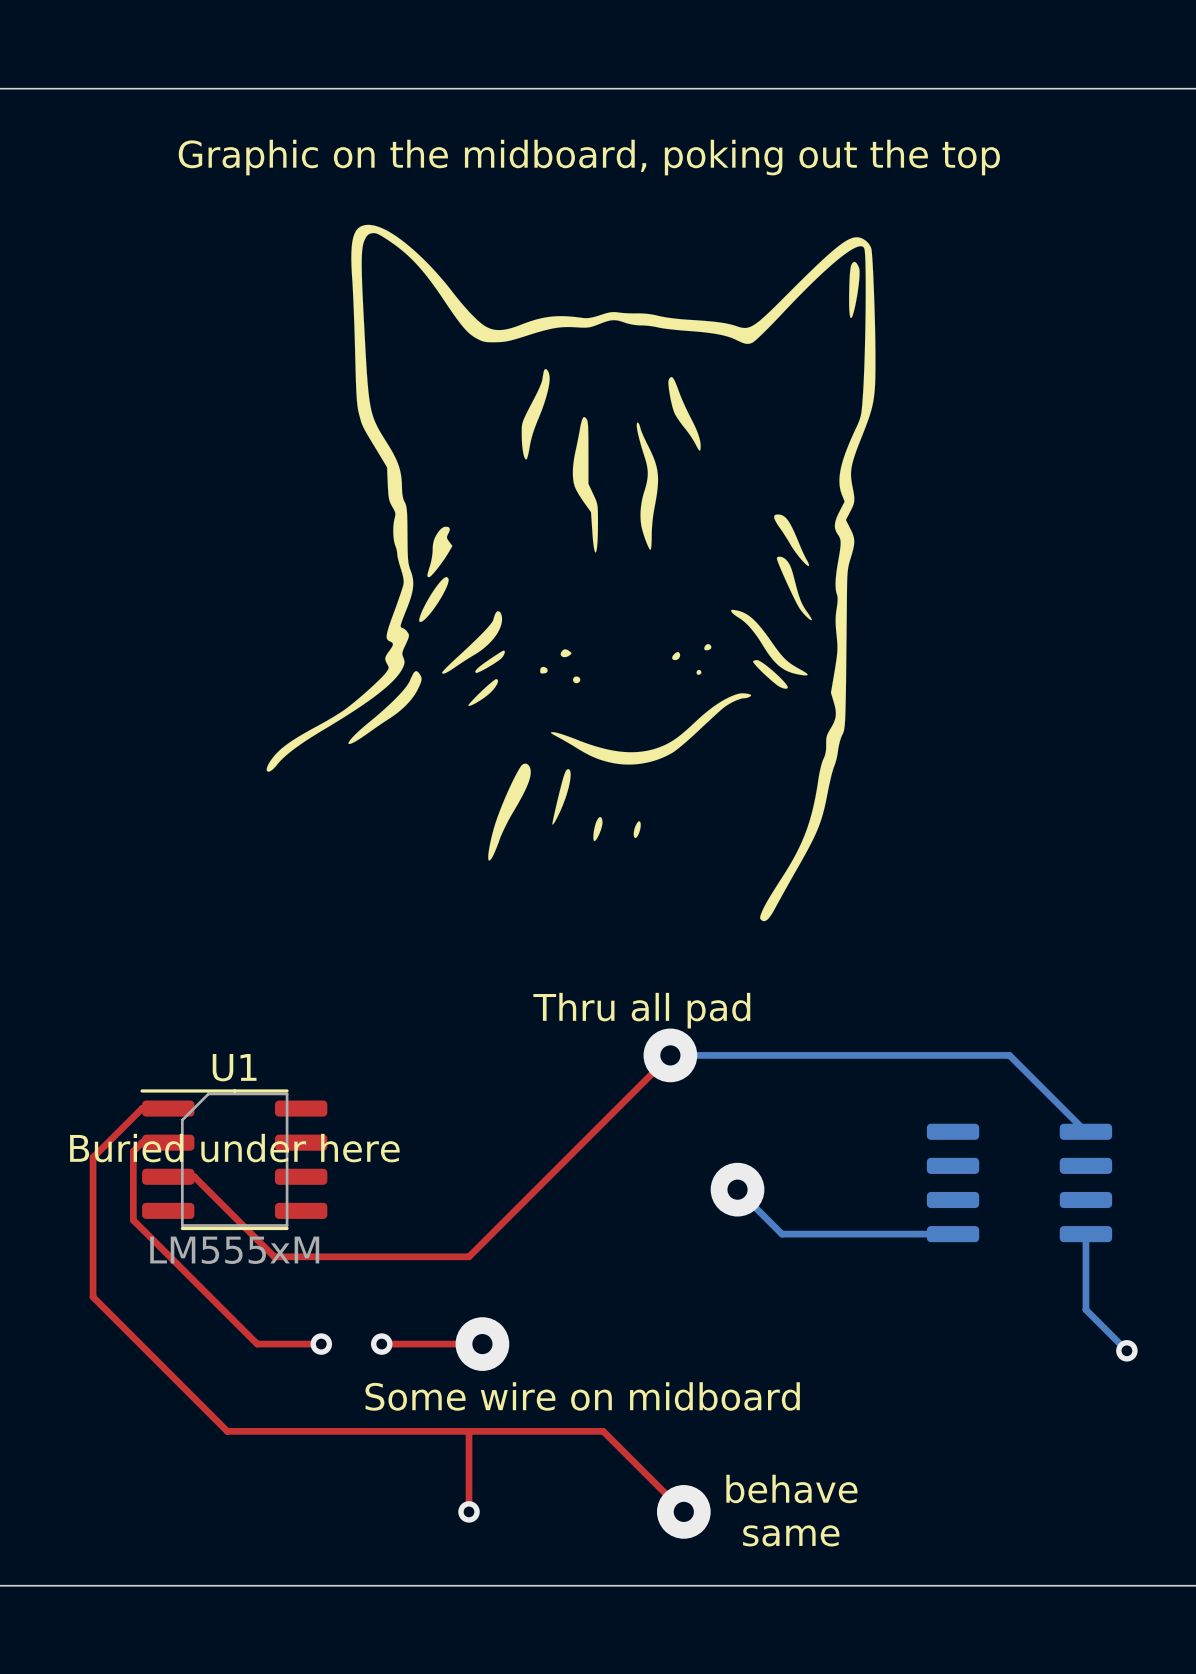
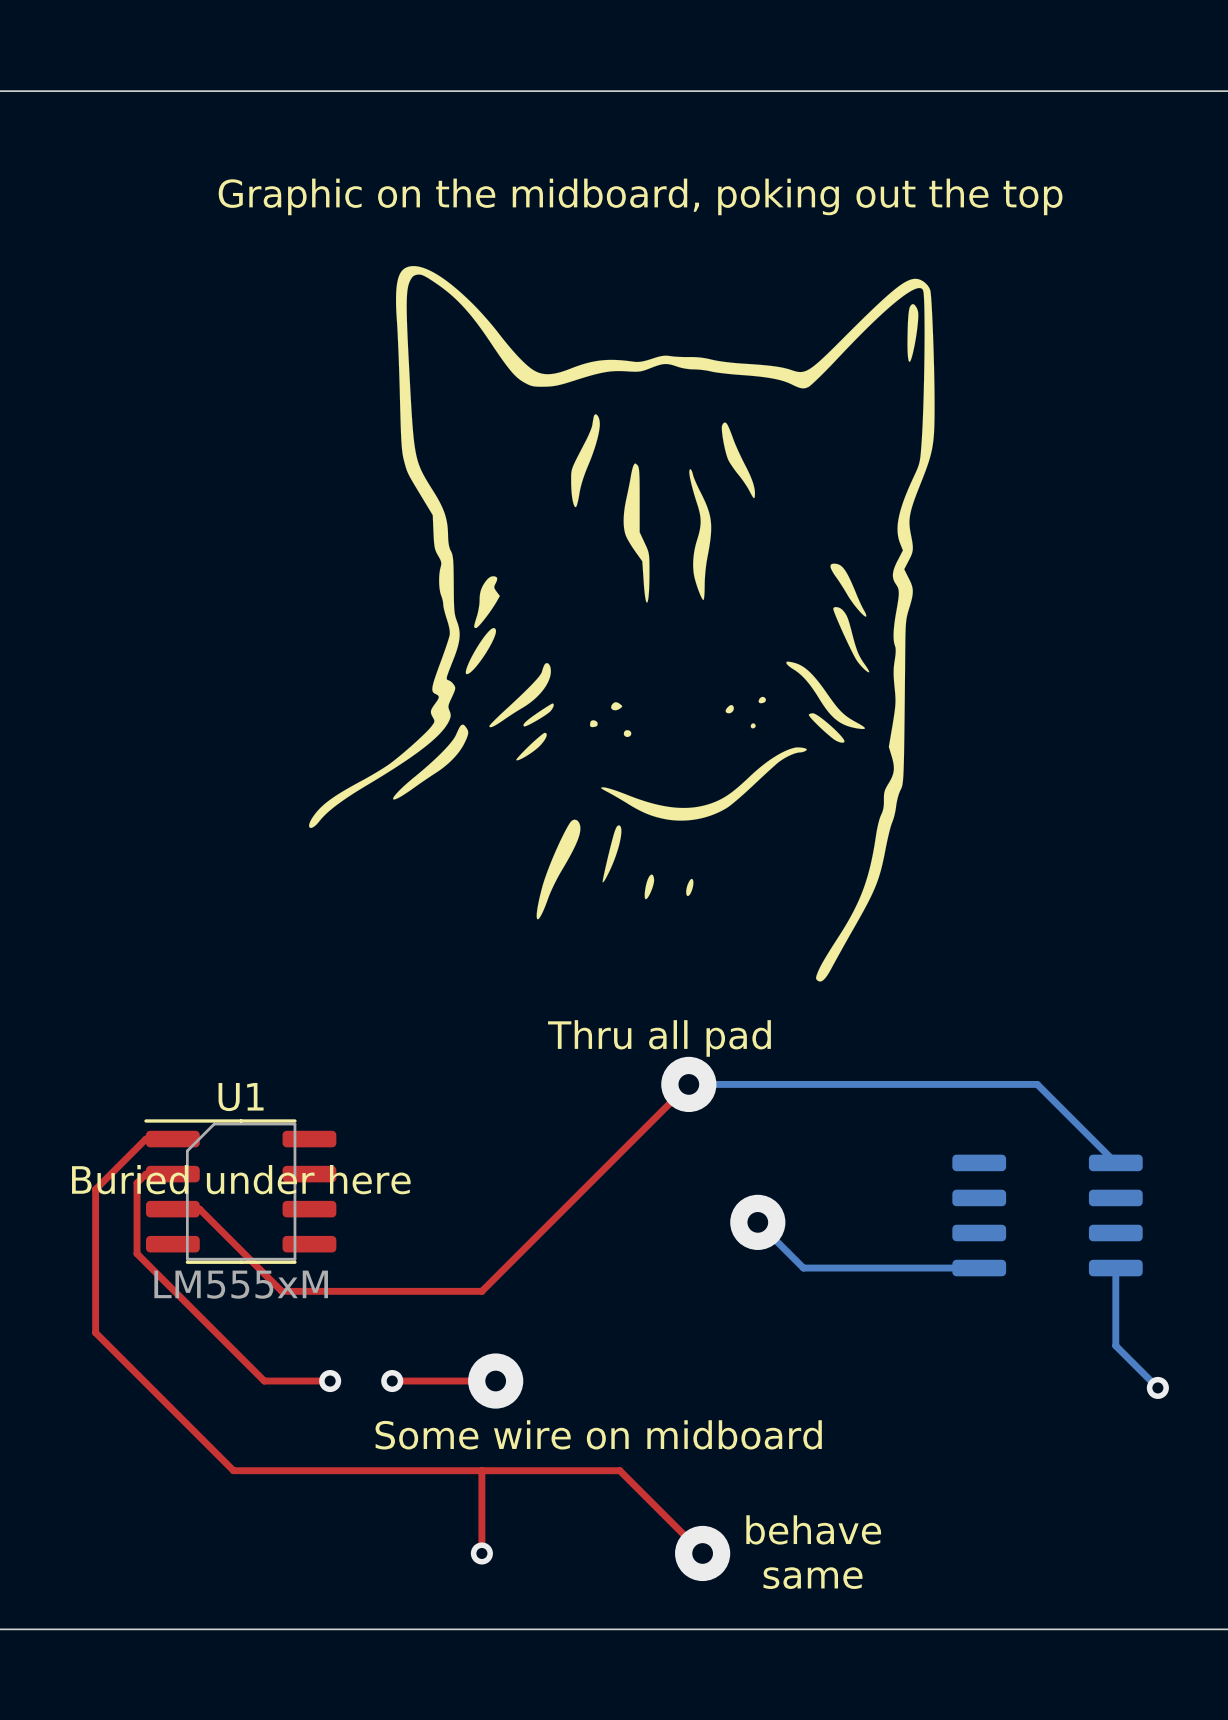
text position: Graphic on the midboard, poking out the top (589, 157) -> Graphic on the midboard, poking out the top (640, 196)
drawing position: (571, 573) -> (621, 623)

